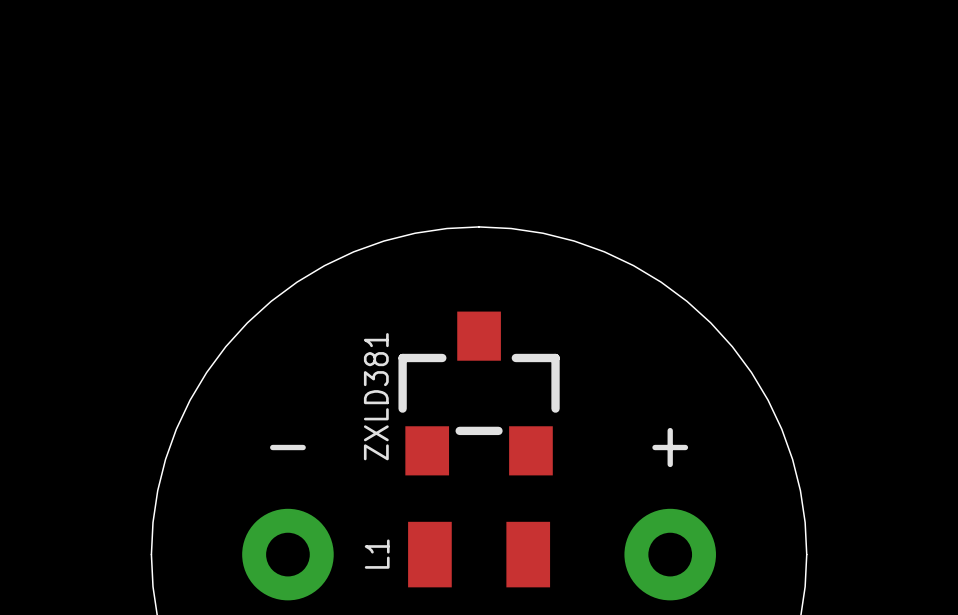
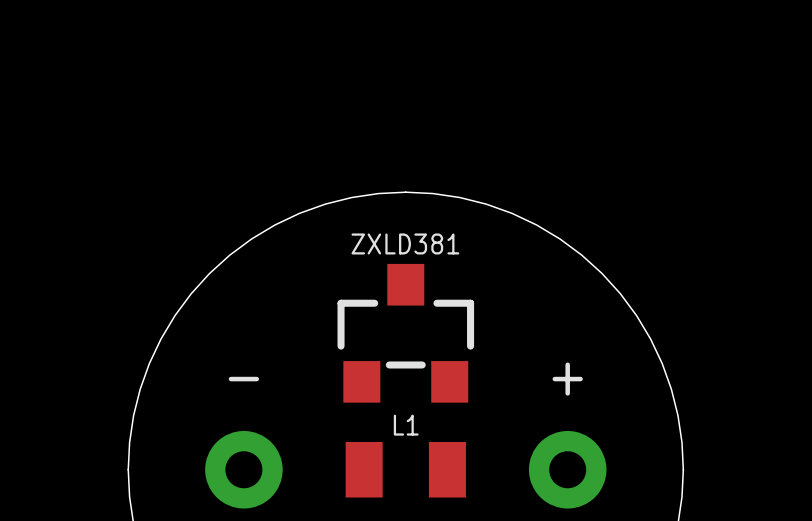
ZXLD381 name rotation: 0° (376, 396) -> 90° clockwise (405, 243)
L1 name rotation: 0° (377, 554) -> 90° clockwise (406, 425)
L1 name position: L1 (377, 554) -> L1 (406, 425)

